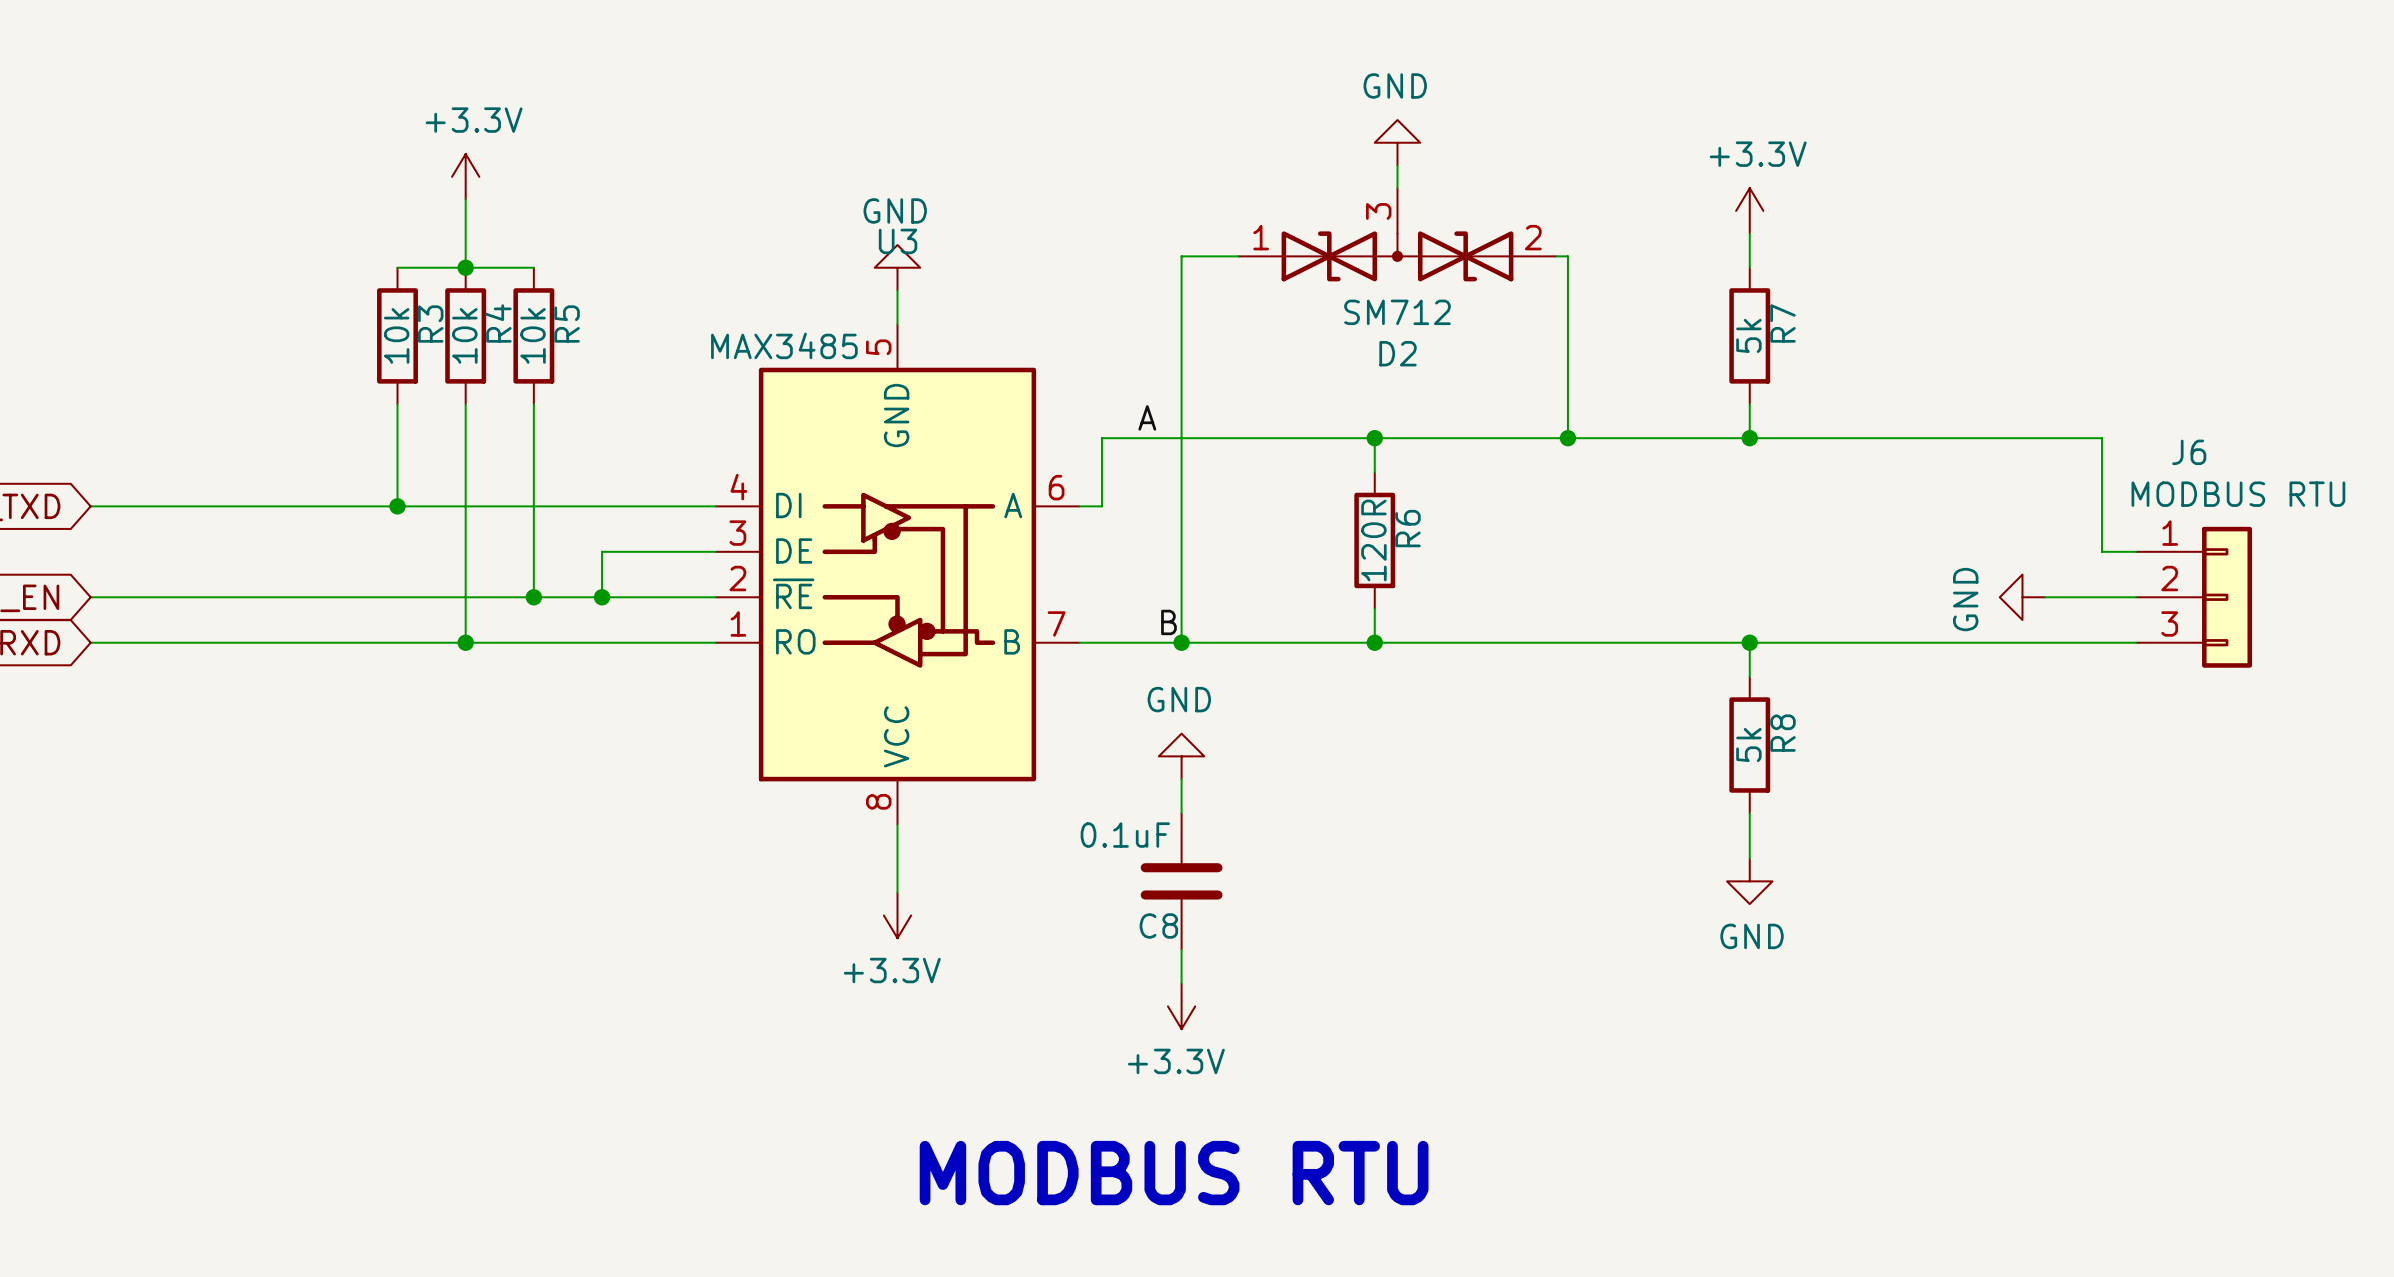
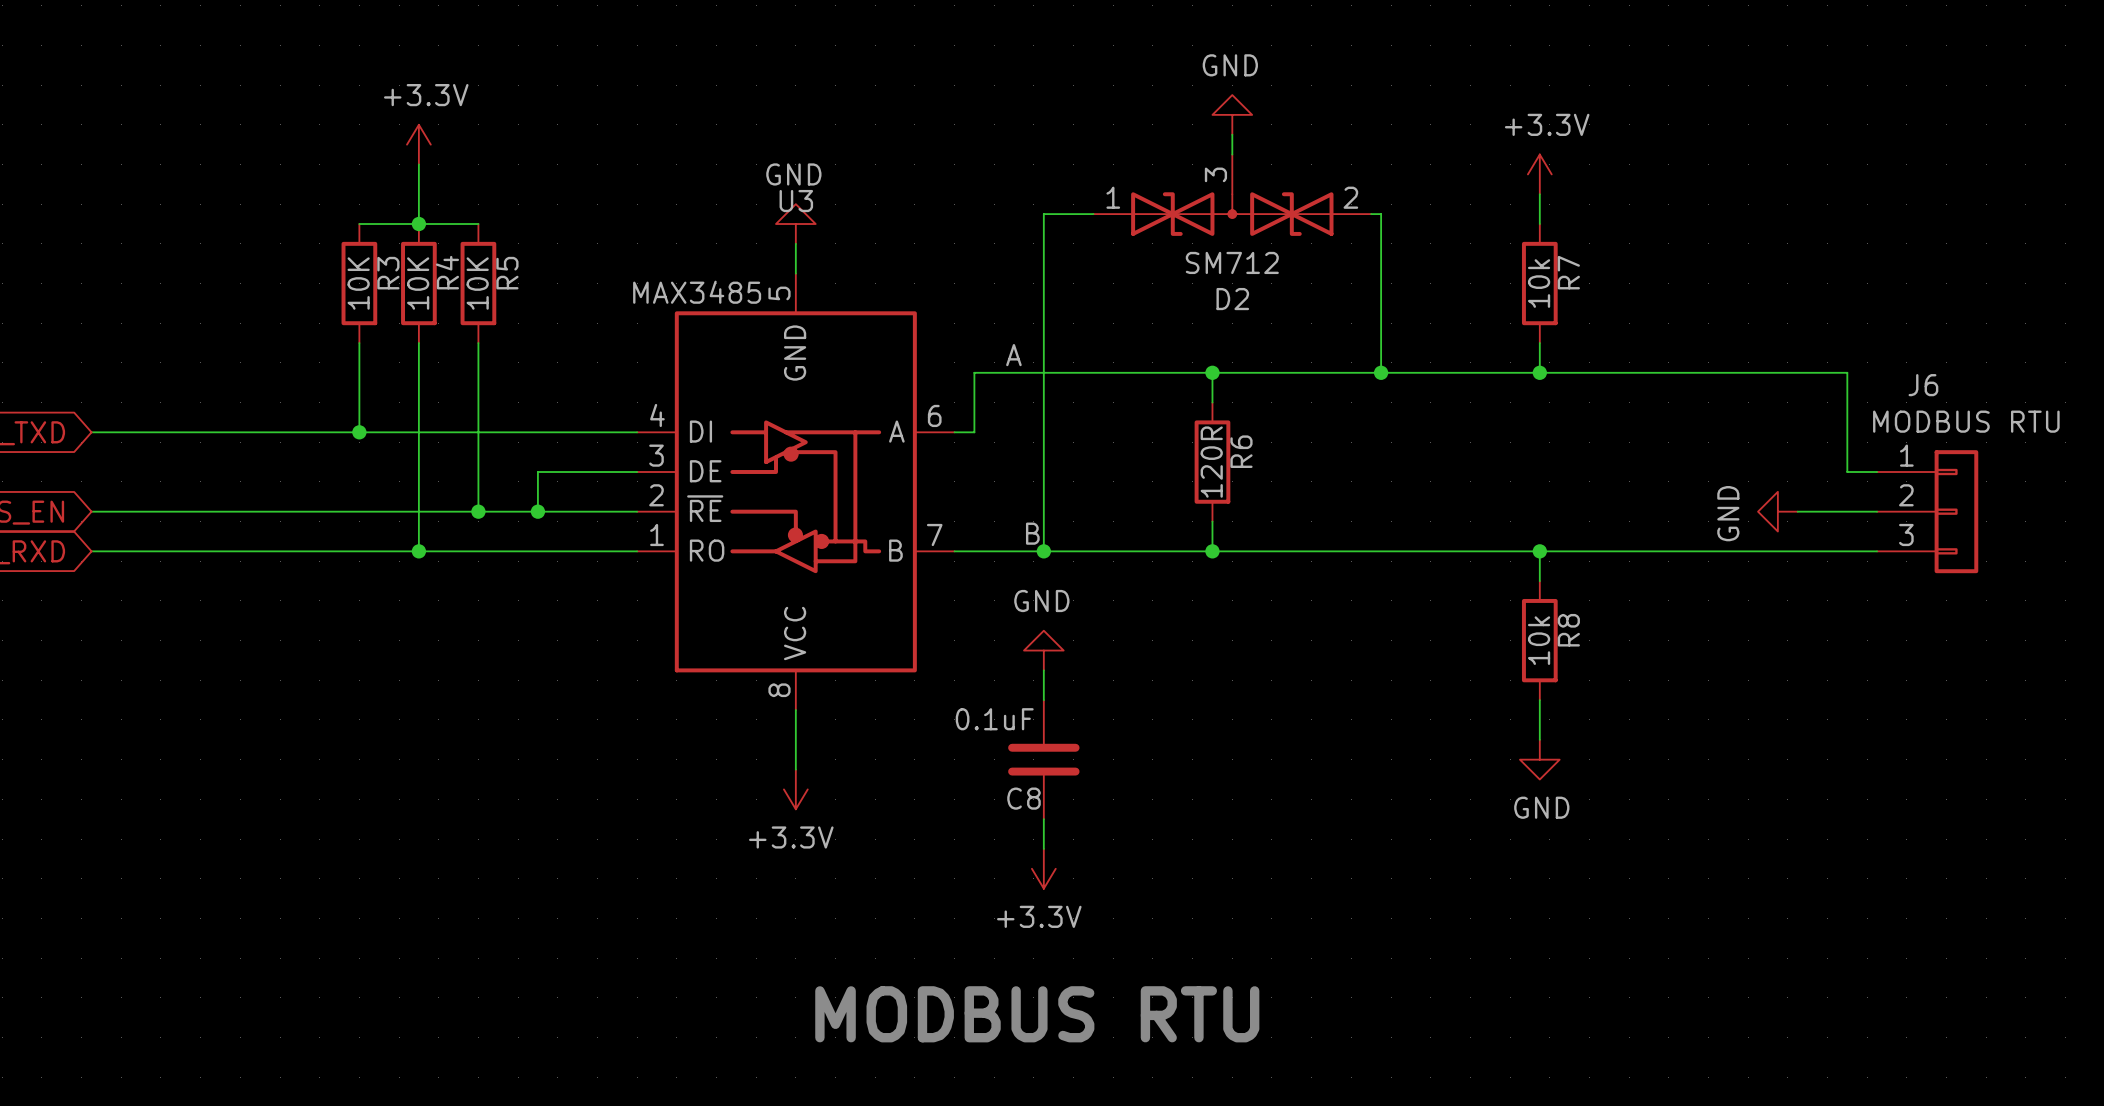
R3 value: 10k (396, 335) -> 10K (358, 283)
R4 value: 10k (464, 335) -> 10K (418, 283)
R5 value: 10k (533, 335) -> 10K (477, 283)
R7 value: 5k (1748, 335) -> 10k (1539, 283)
R8 value: 5k (1748, 745) -> 10k (1539, 640)

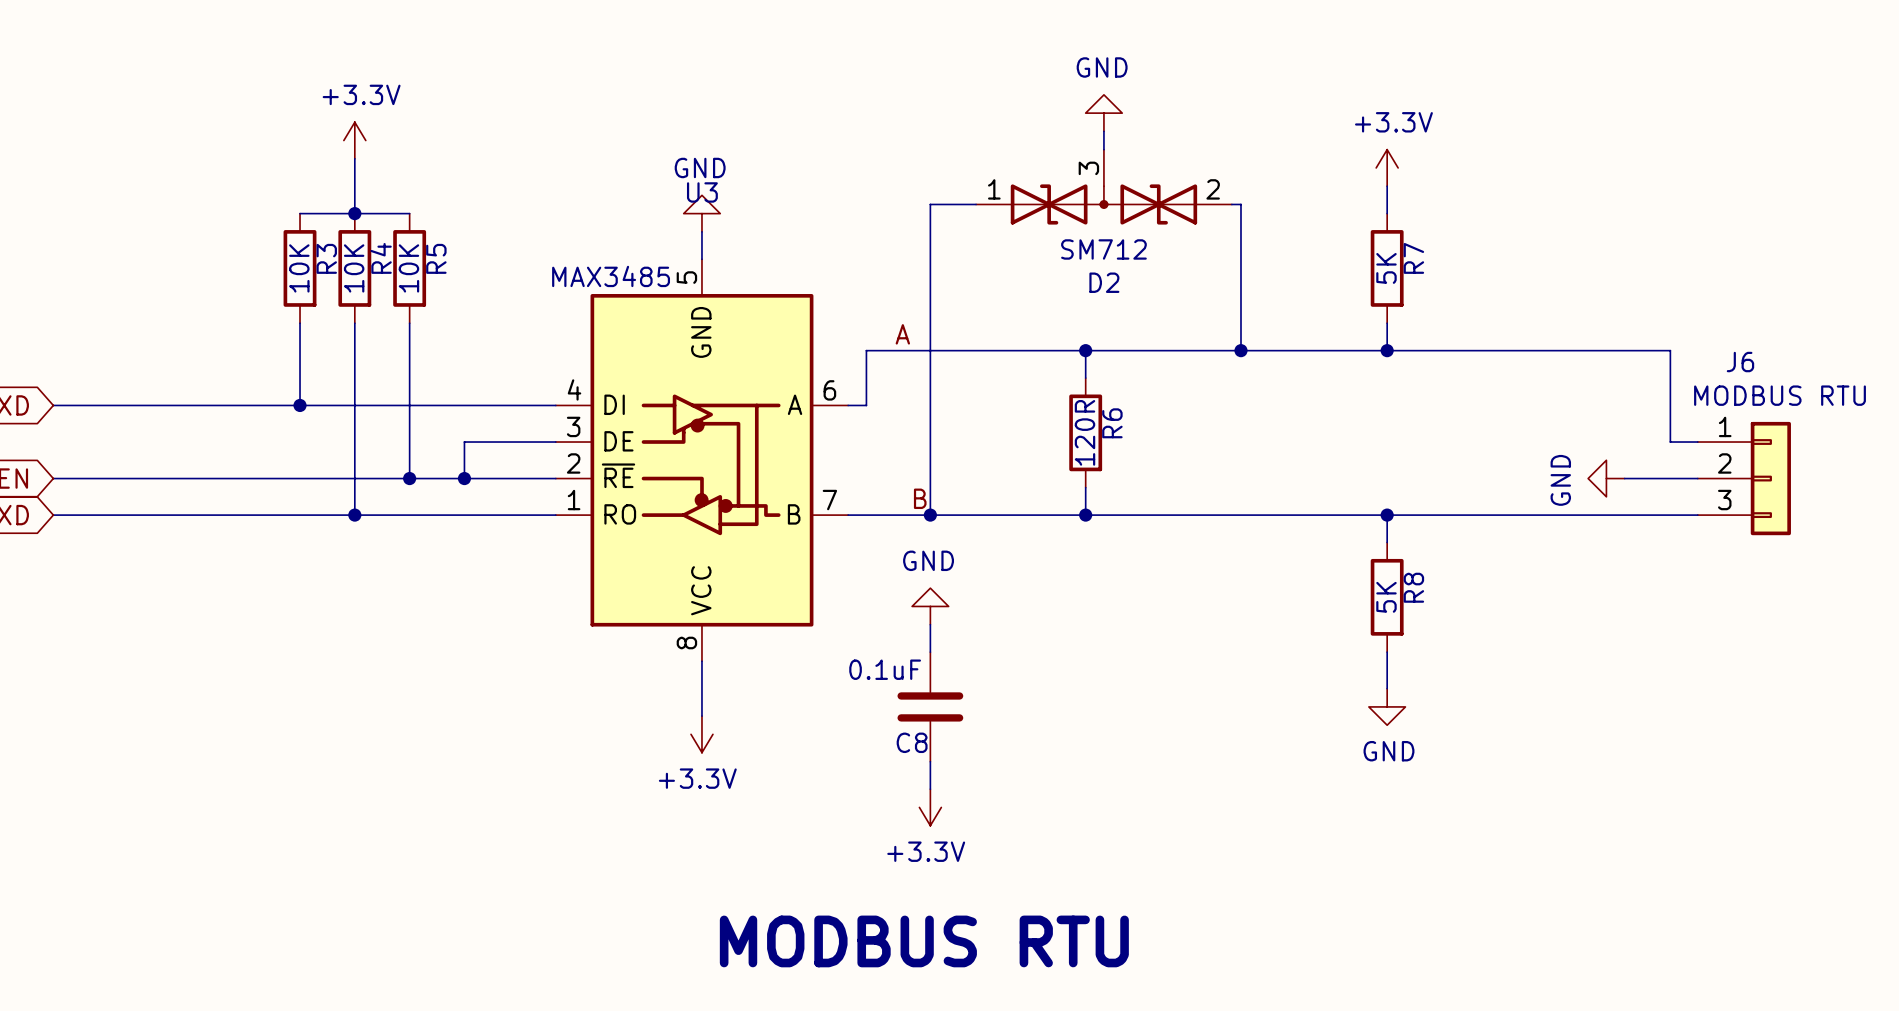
R7 value: 10k (1539, 283) -> 5K (1386, 268)
R8 value: 10k (1539, 640) -> 5K (1386, 597)

